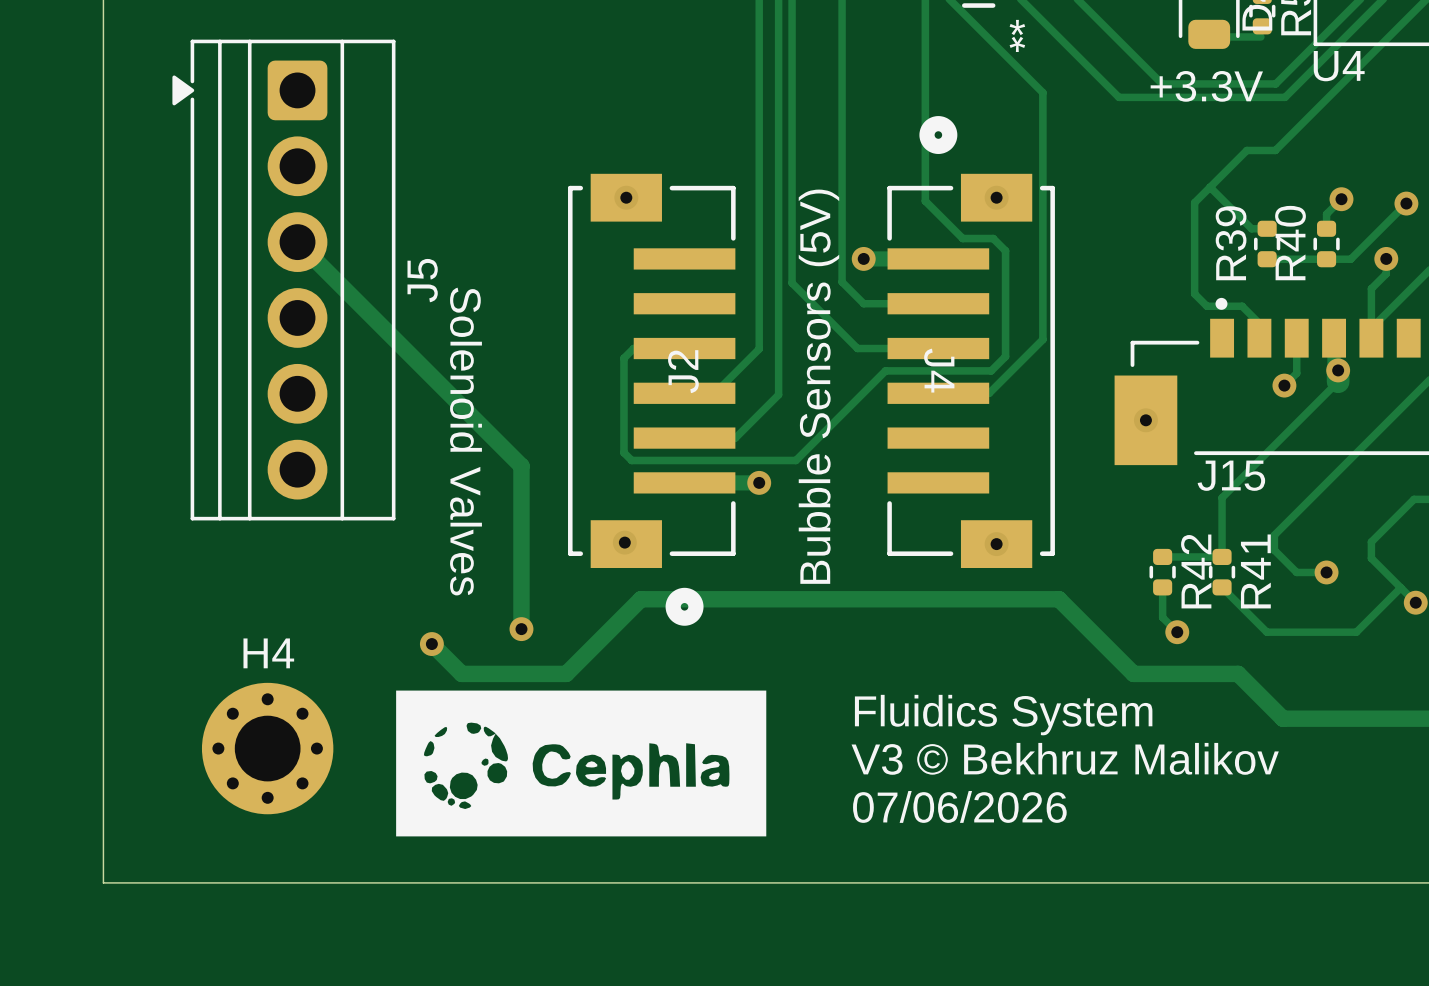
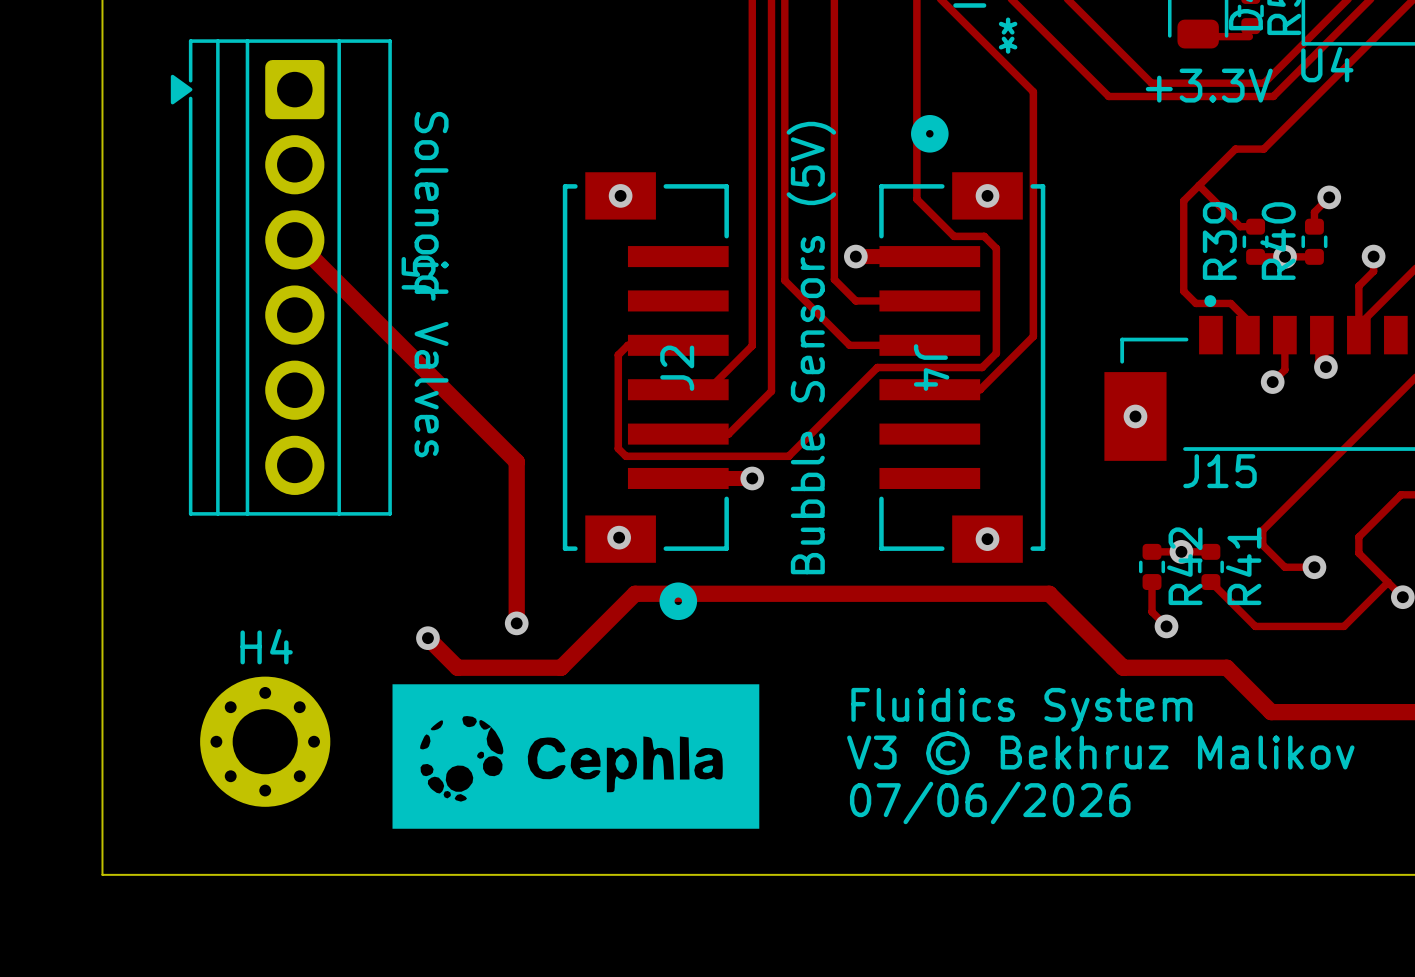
track: (1406, 203) (1350, 259) (1326, 259) -> none
via position: (1406, 203) -> (1285, 256)
track: (1338, 370) (1338, 381) (1222, 497) (1222, 556) -> none
text position: Solenoid Valves (465, 441) -> Solenoid Valves (431, 284)
via: none -> (1181, 551)

